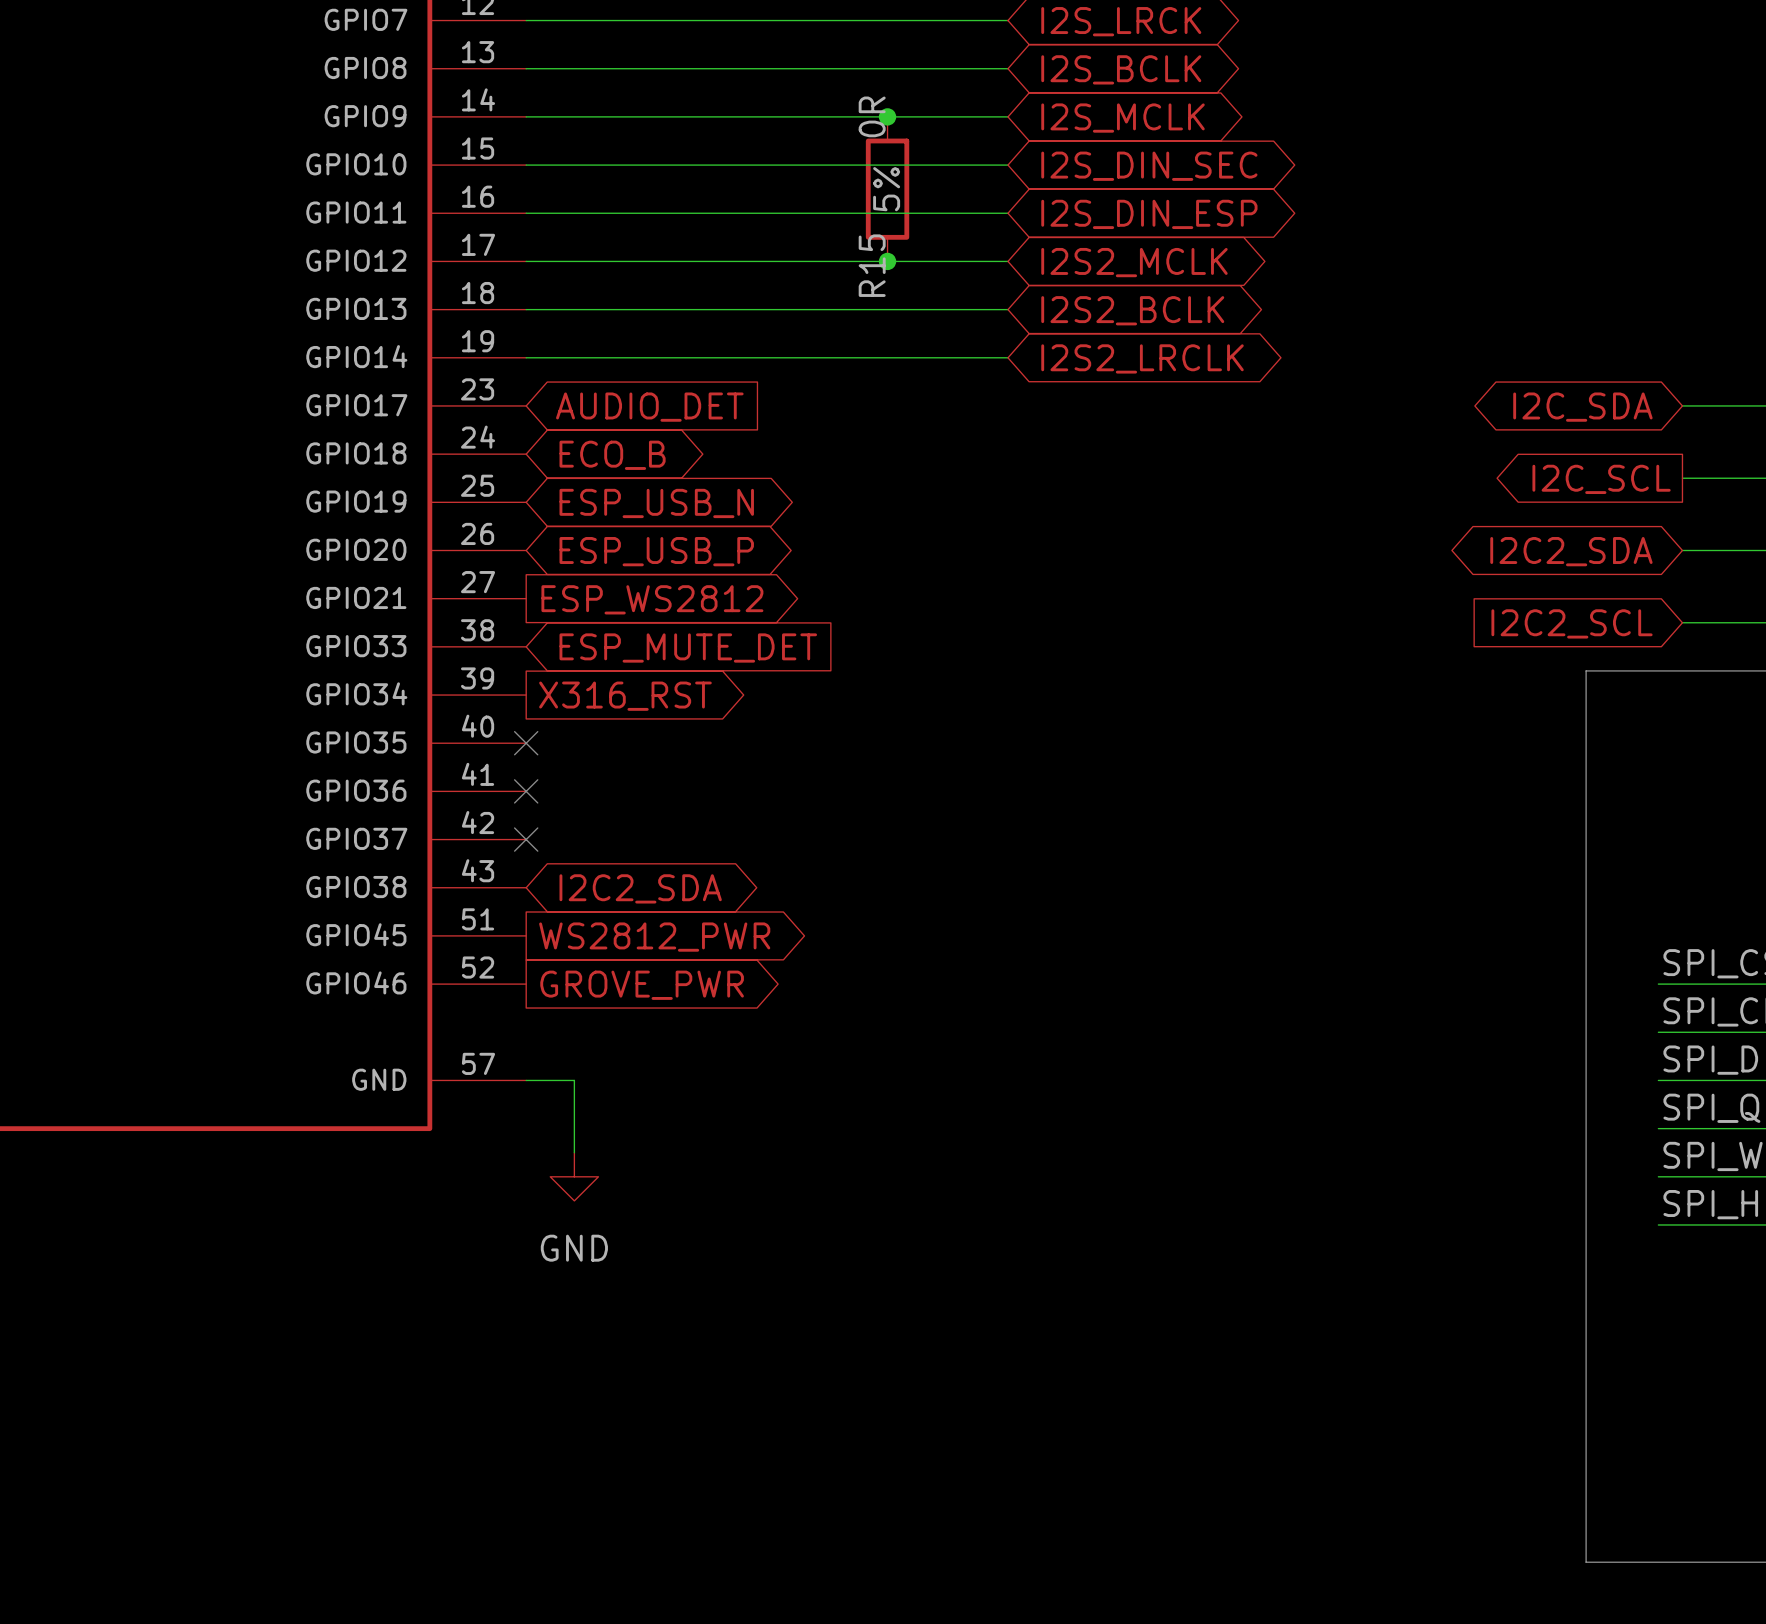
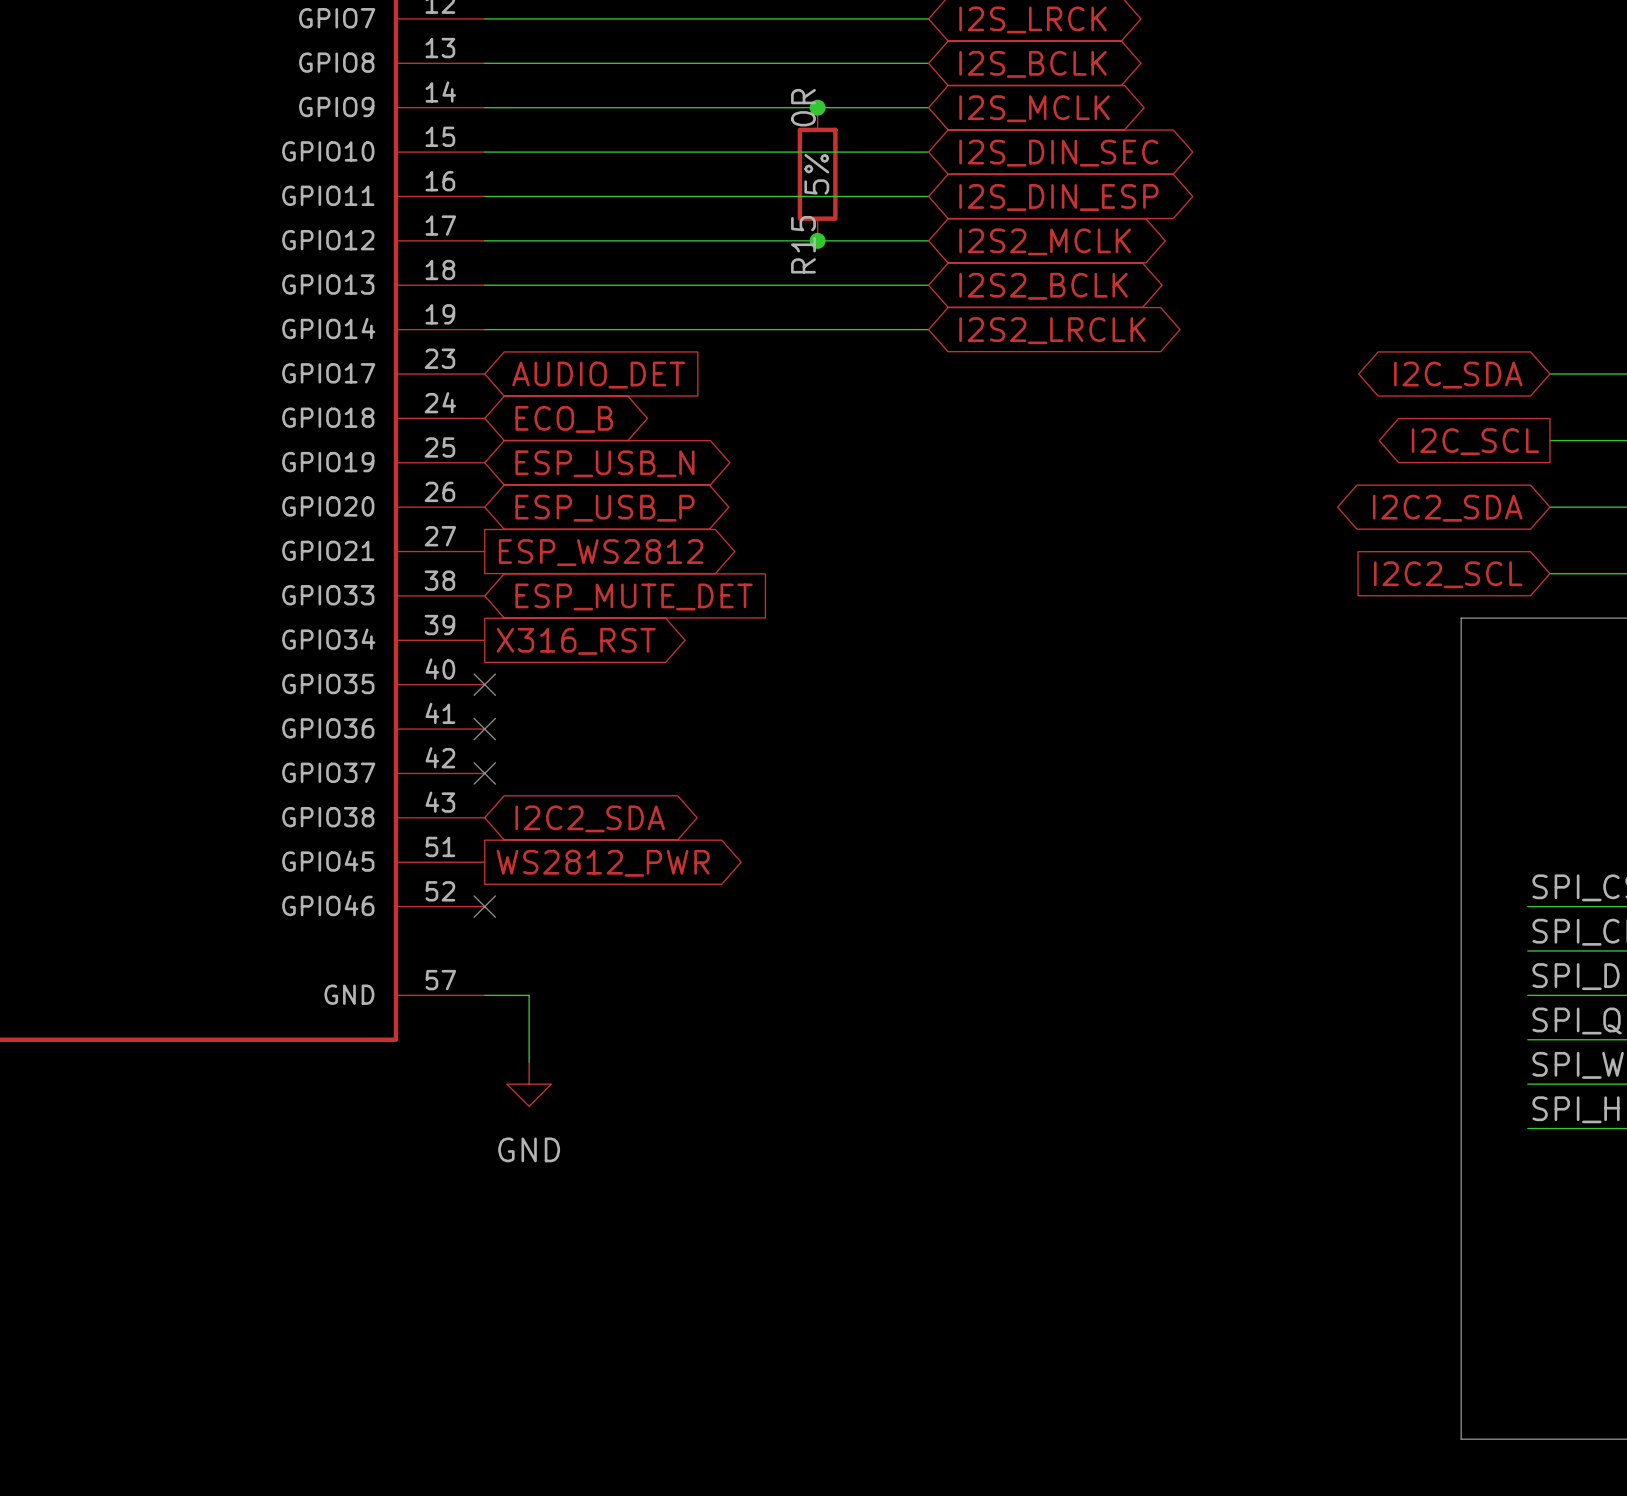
no-connect mark: none -> (484, 906)
global label: GROVE_PWR (642, 985) -> none

